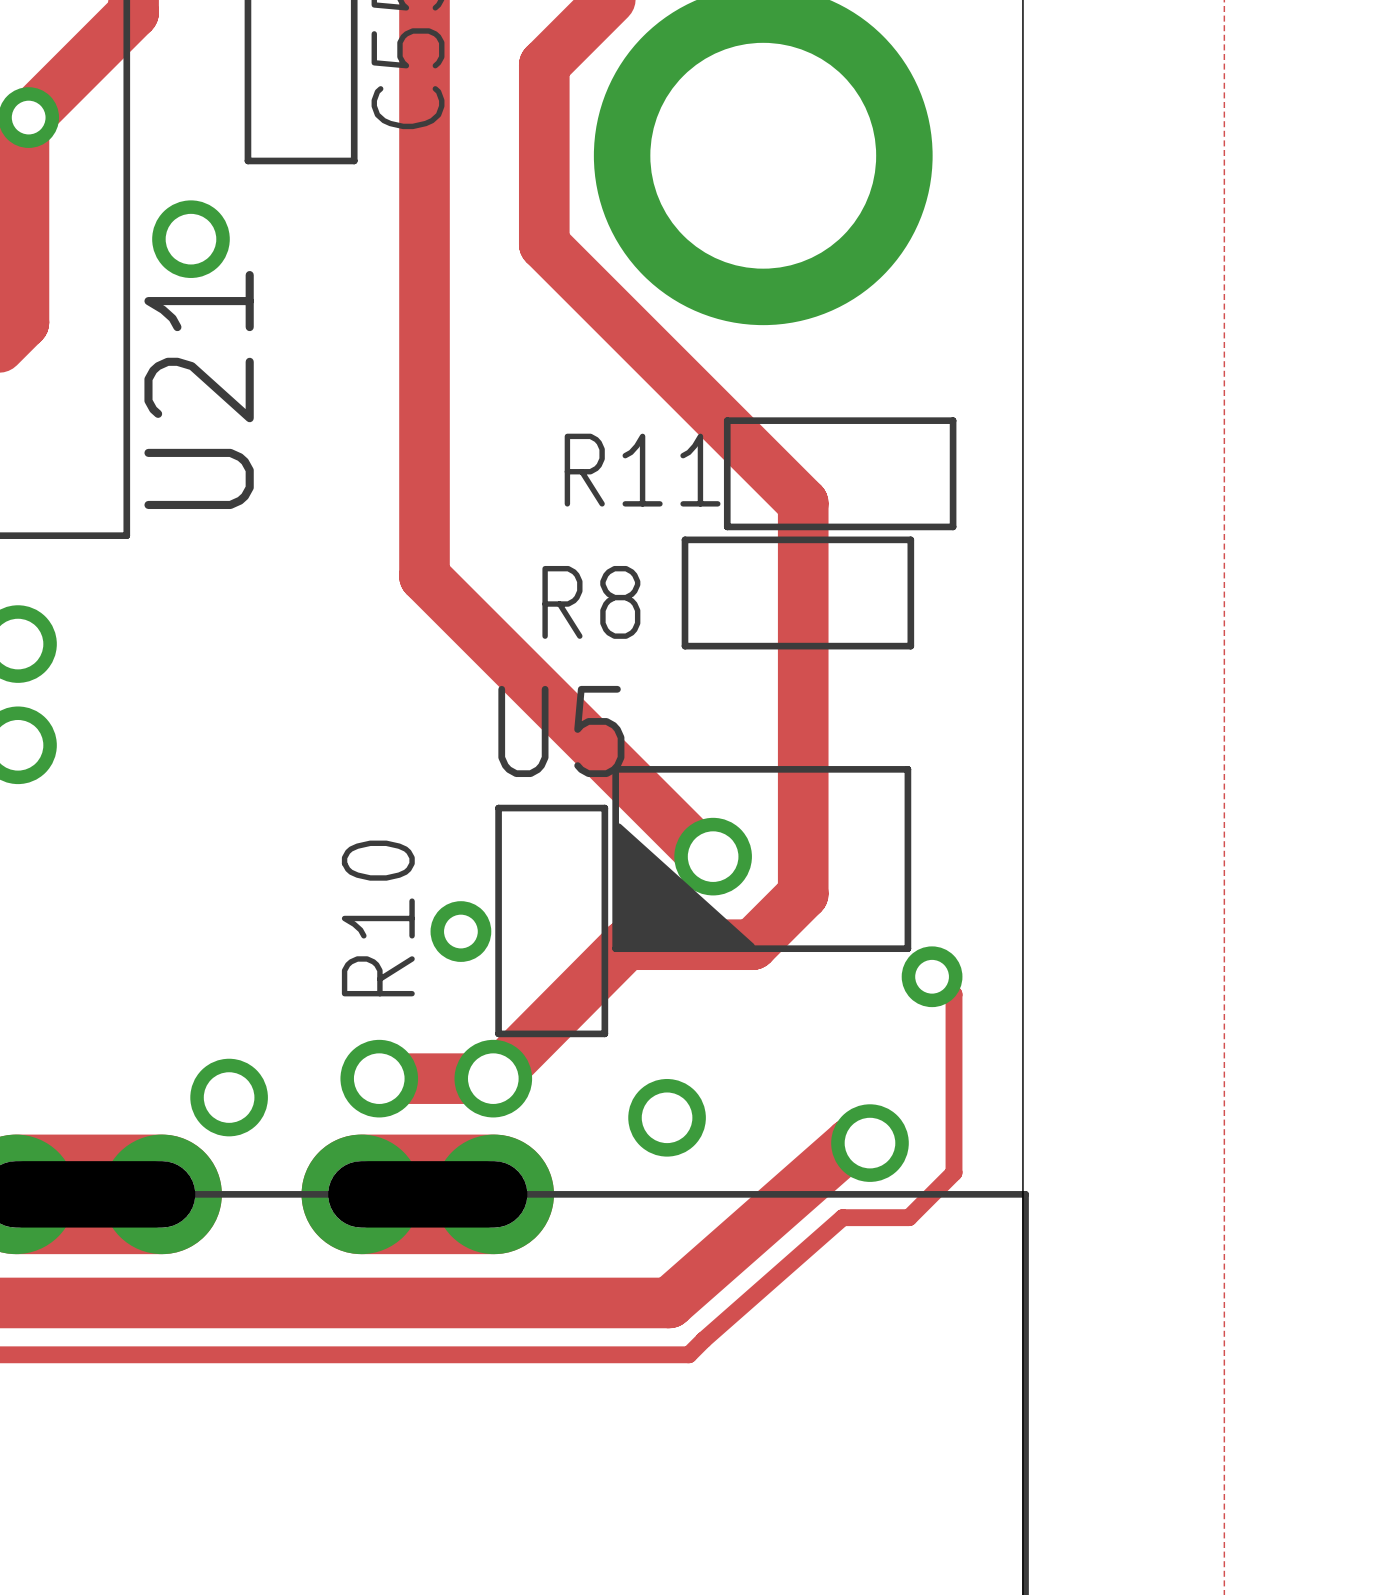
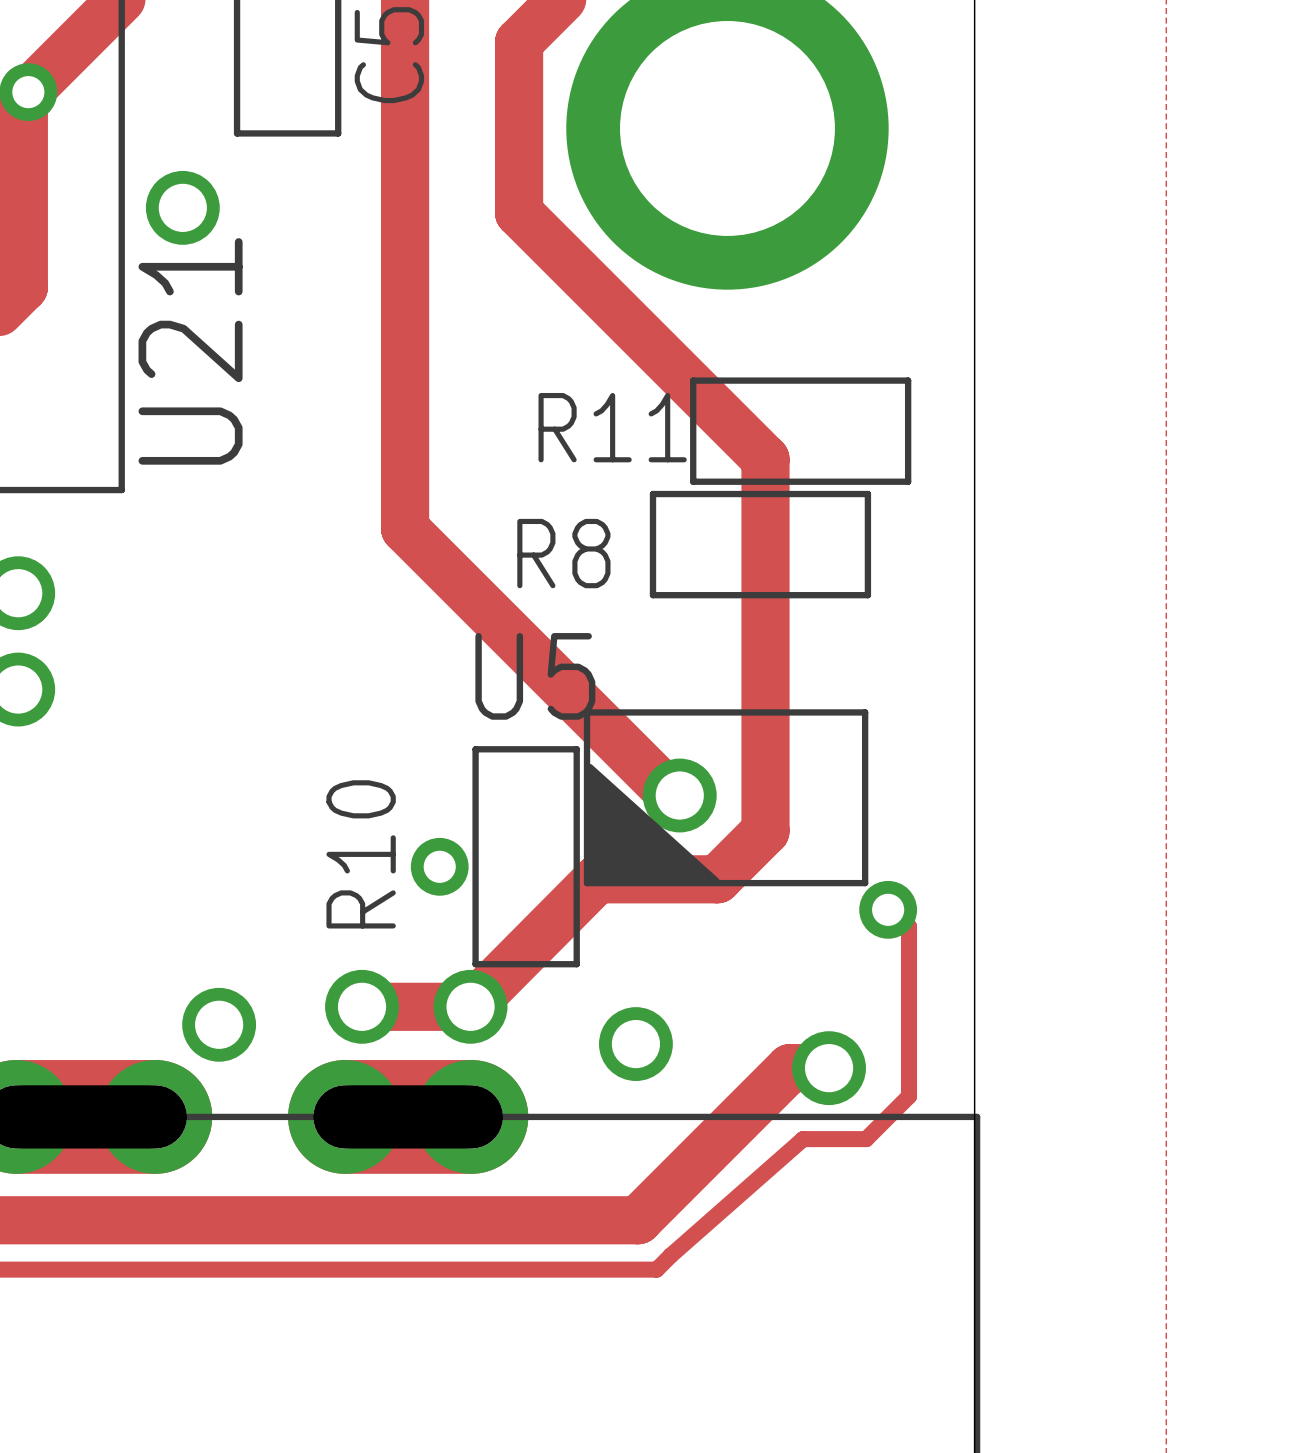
track: (850, 1143) (669, 1302) -> (810, 1068) (790, 1068) (637, 1220)

